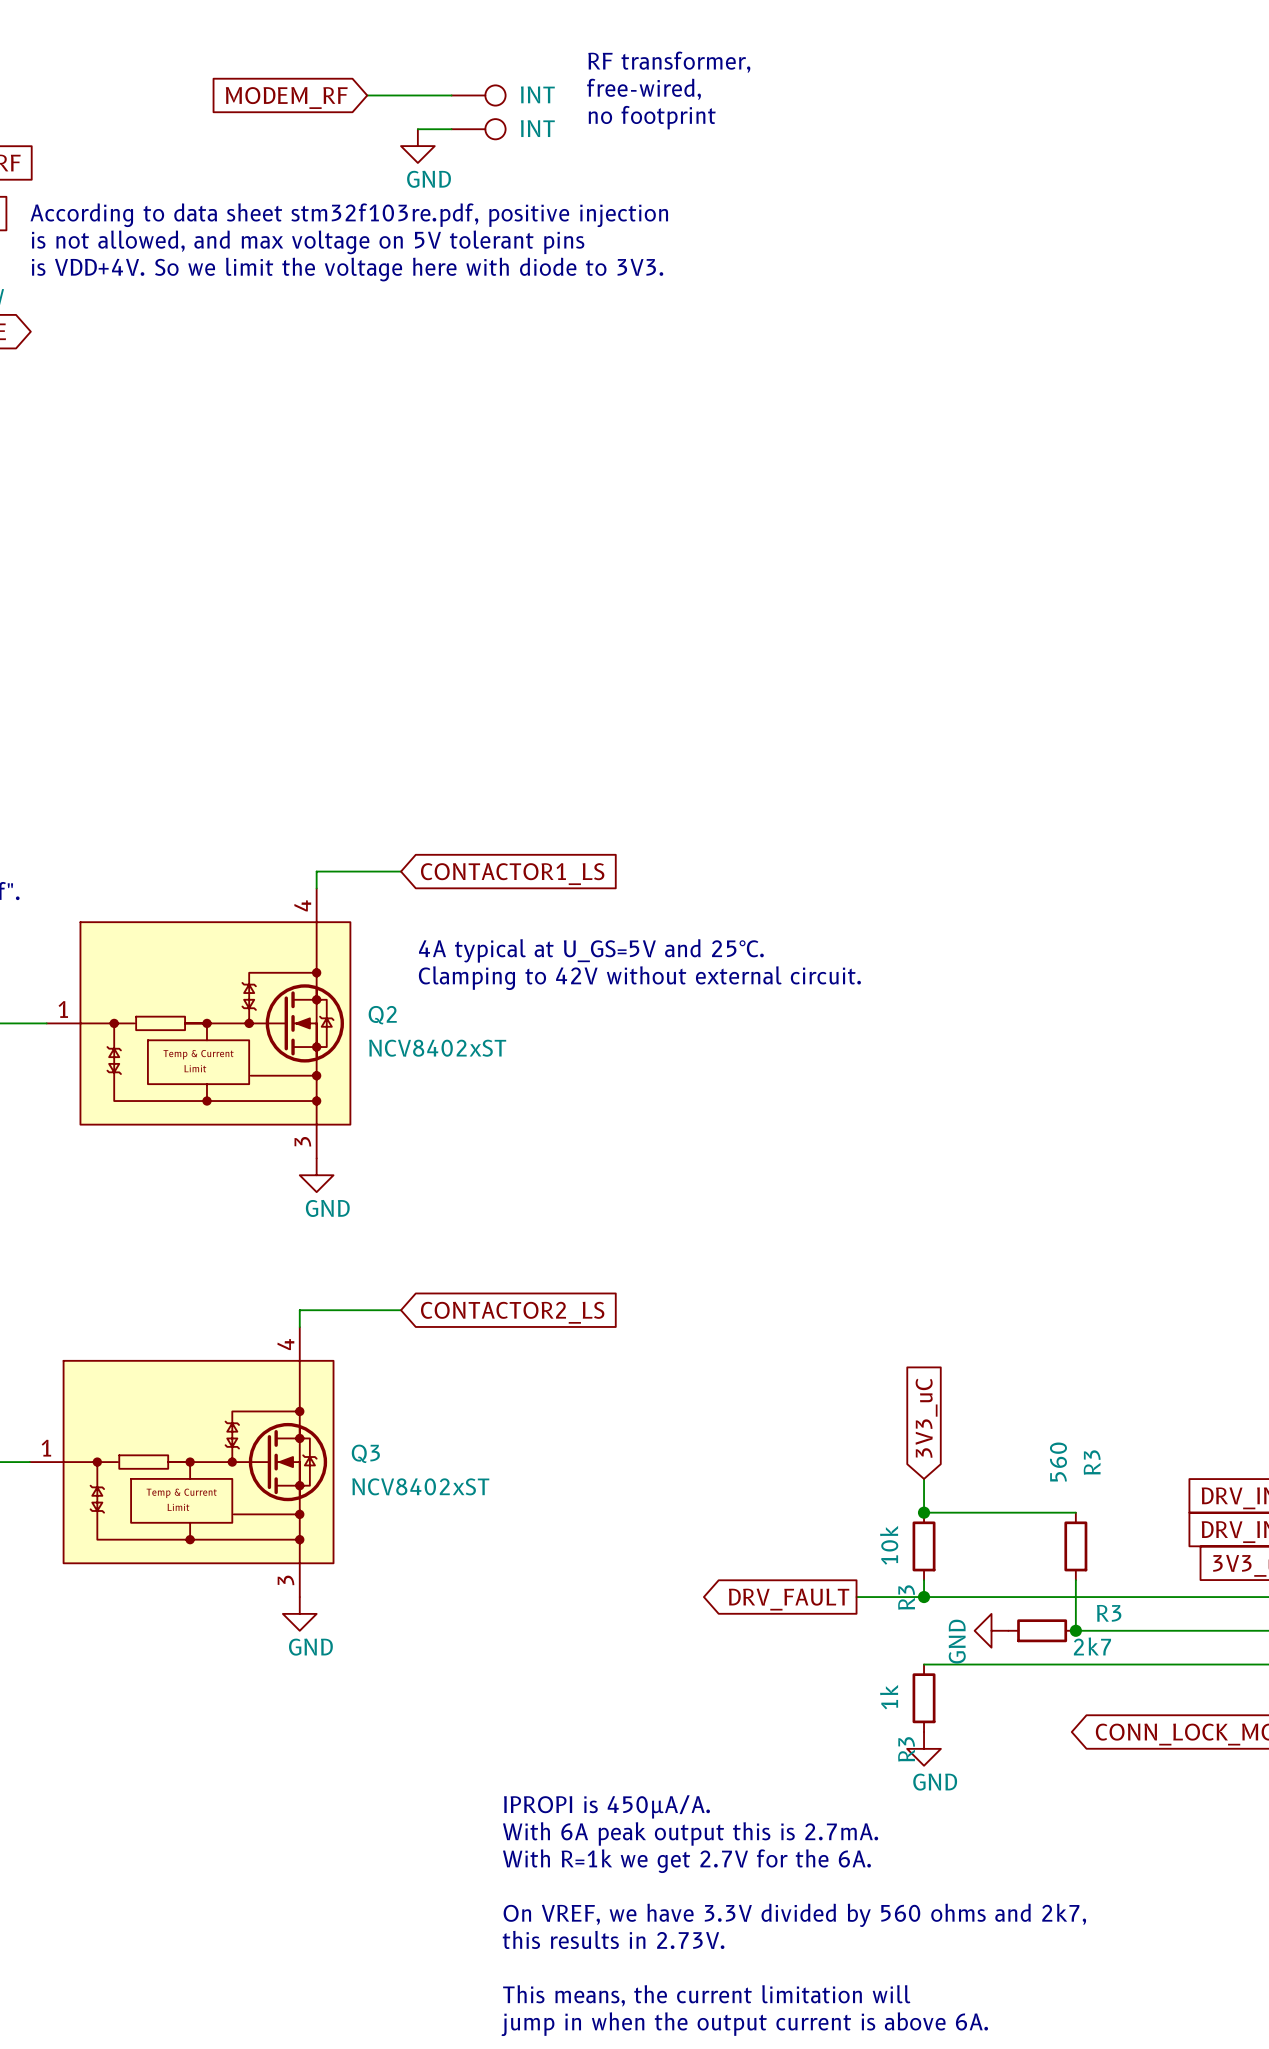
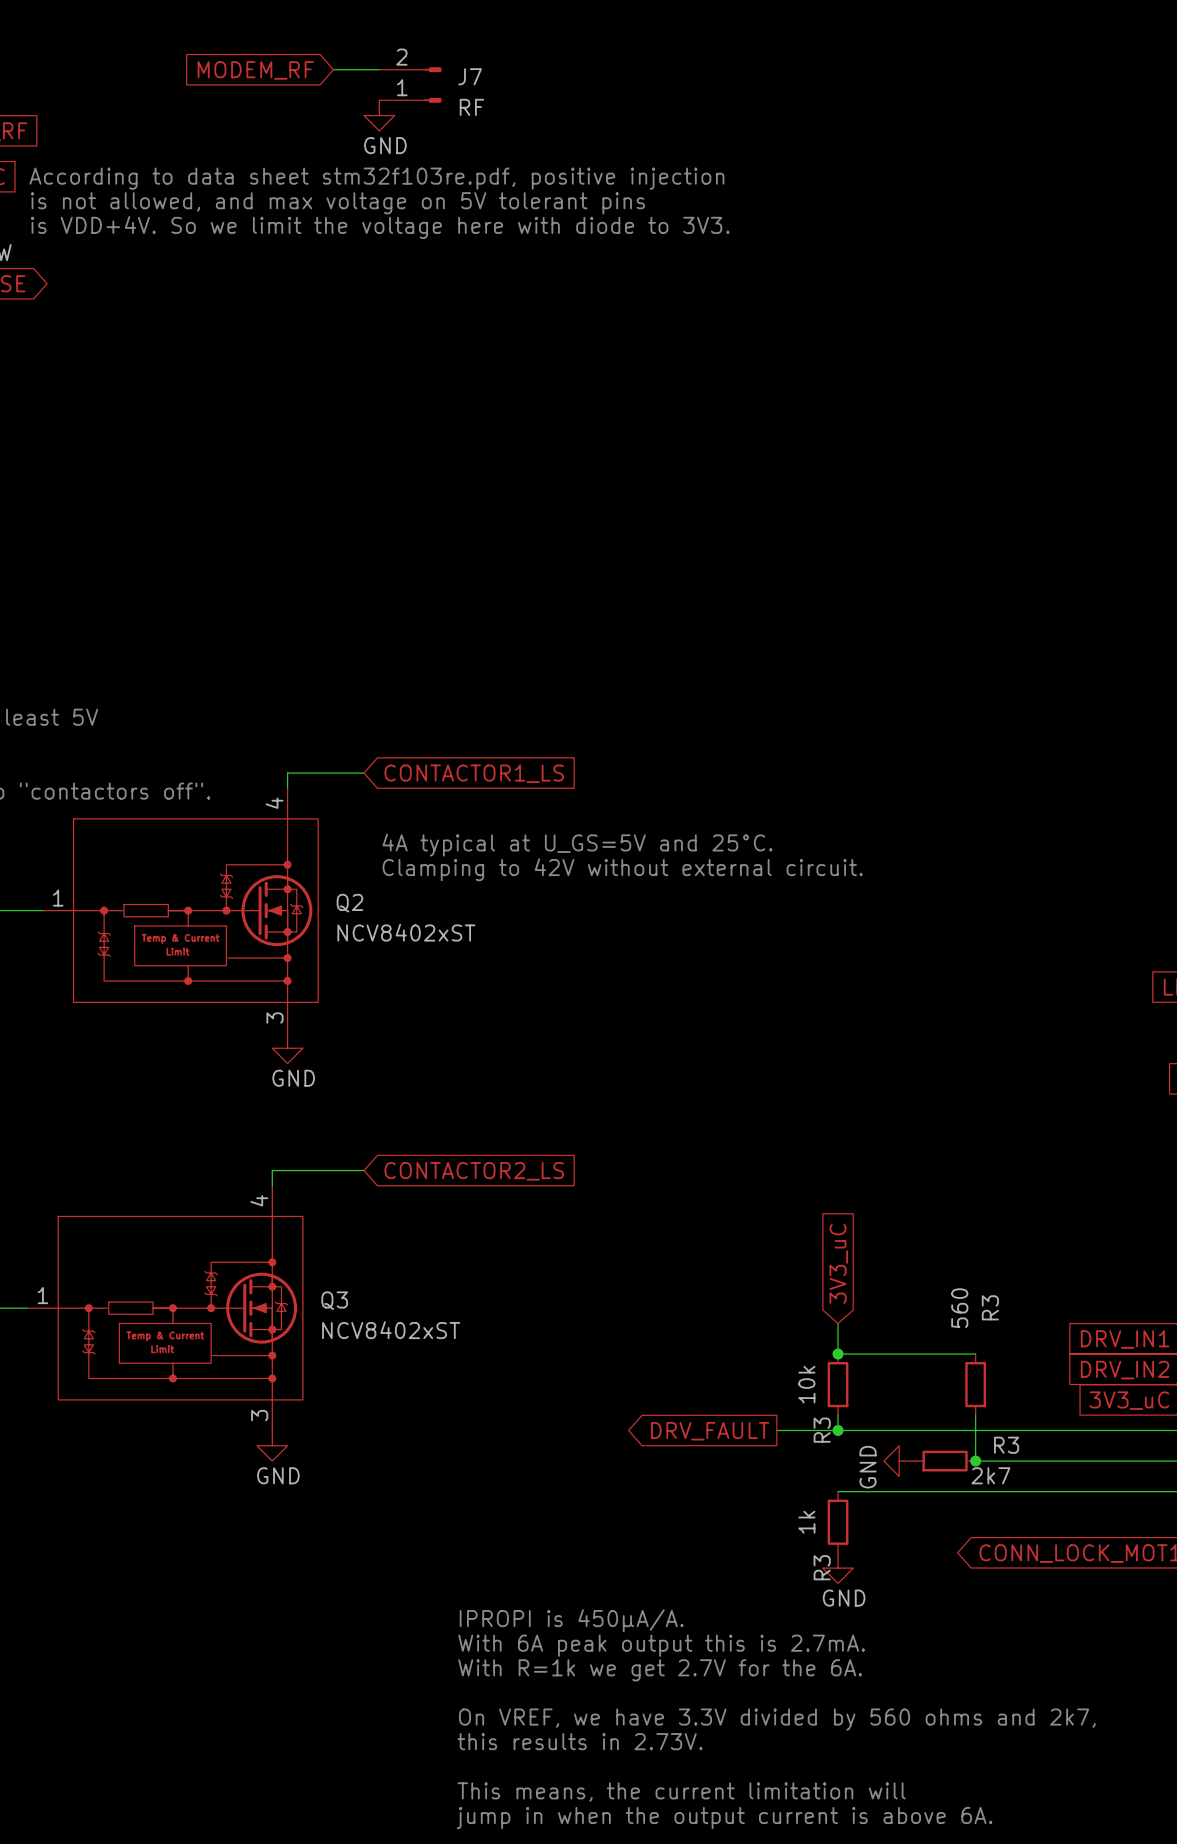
text: RF transformer, (669, 62) -> none
text: free-wired, (644, 89) -> none
INT: (478, 95) -> none
J7: none -> RF (410, 84)
text: no footprint (652, 117) -> none
INT: (478, 129) -> none

